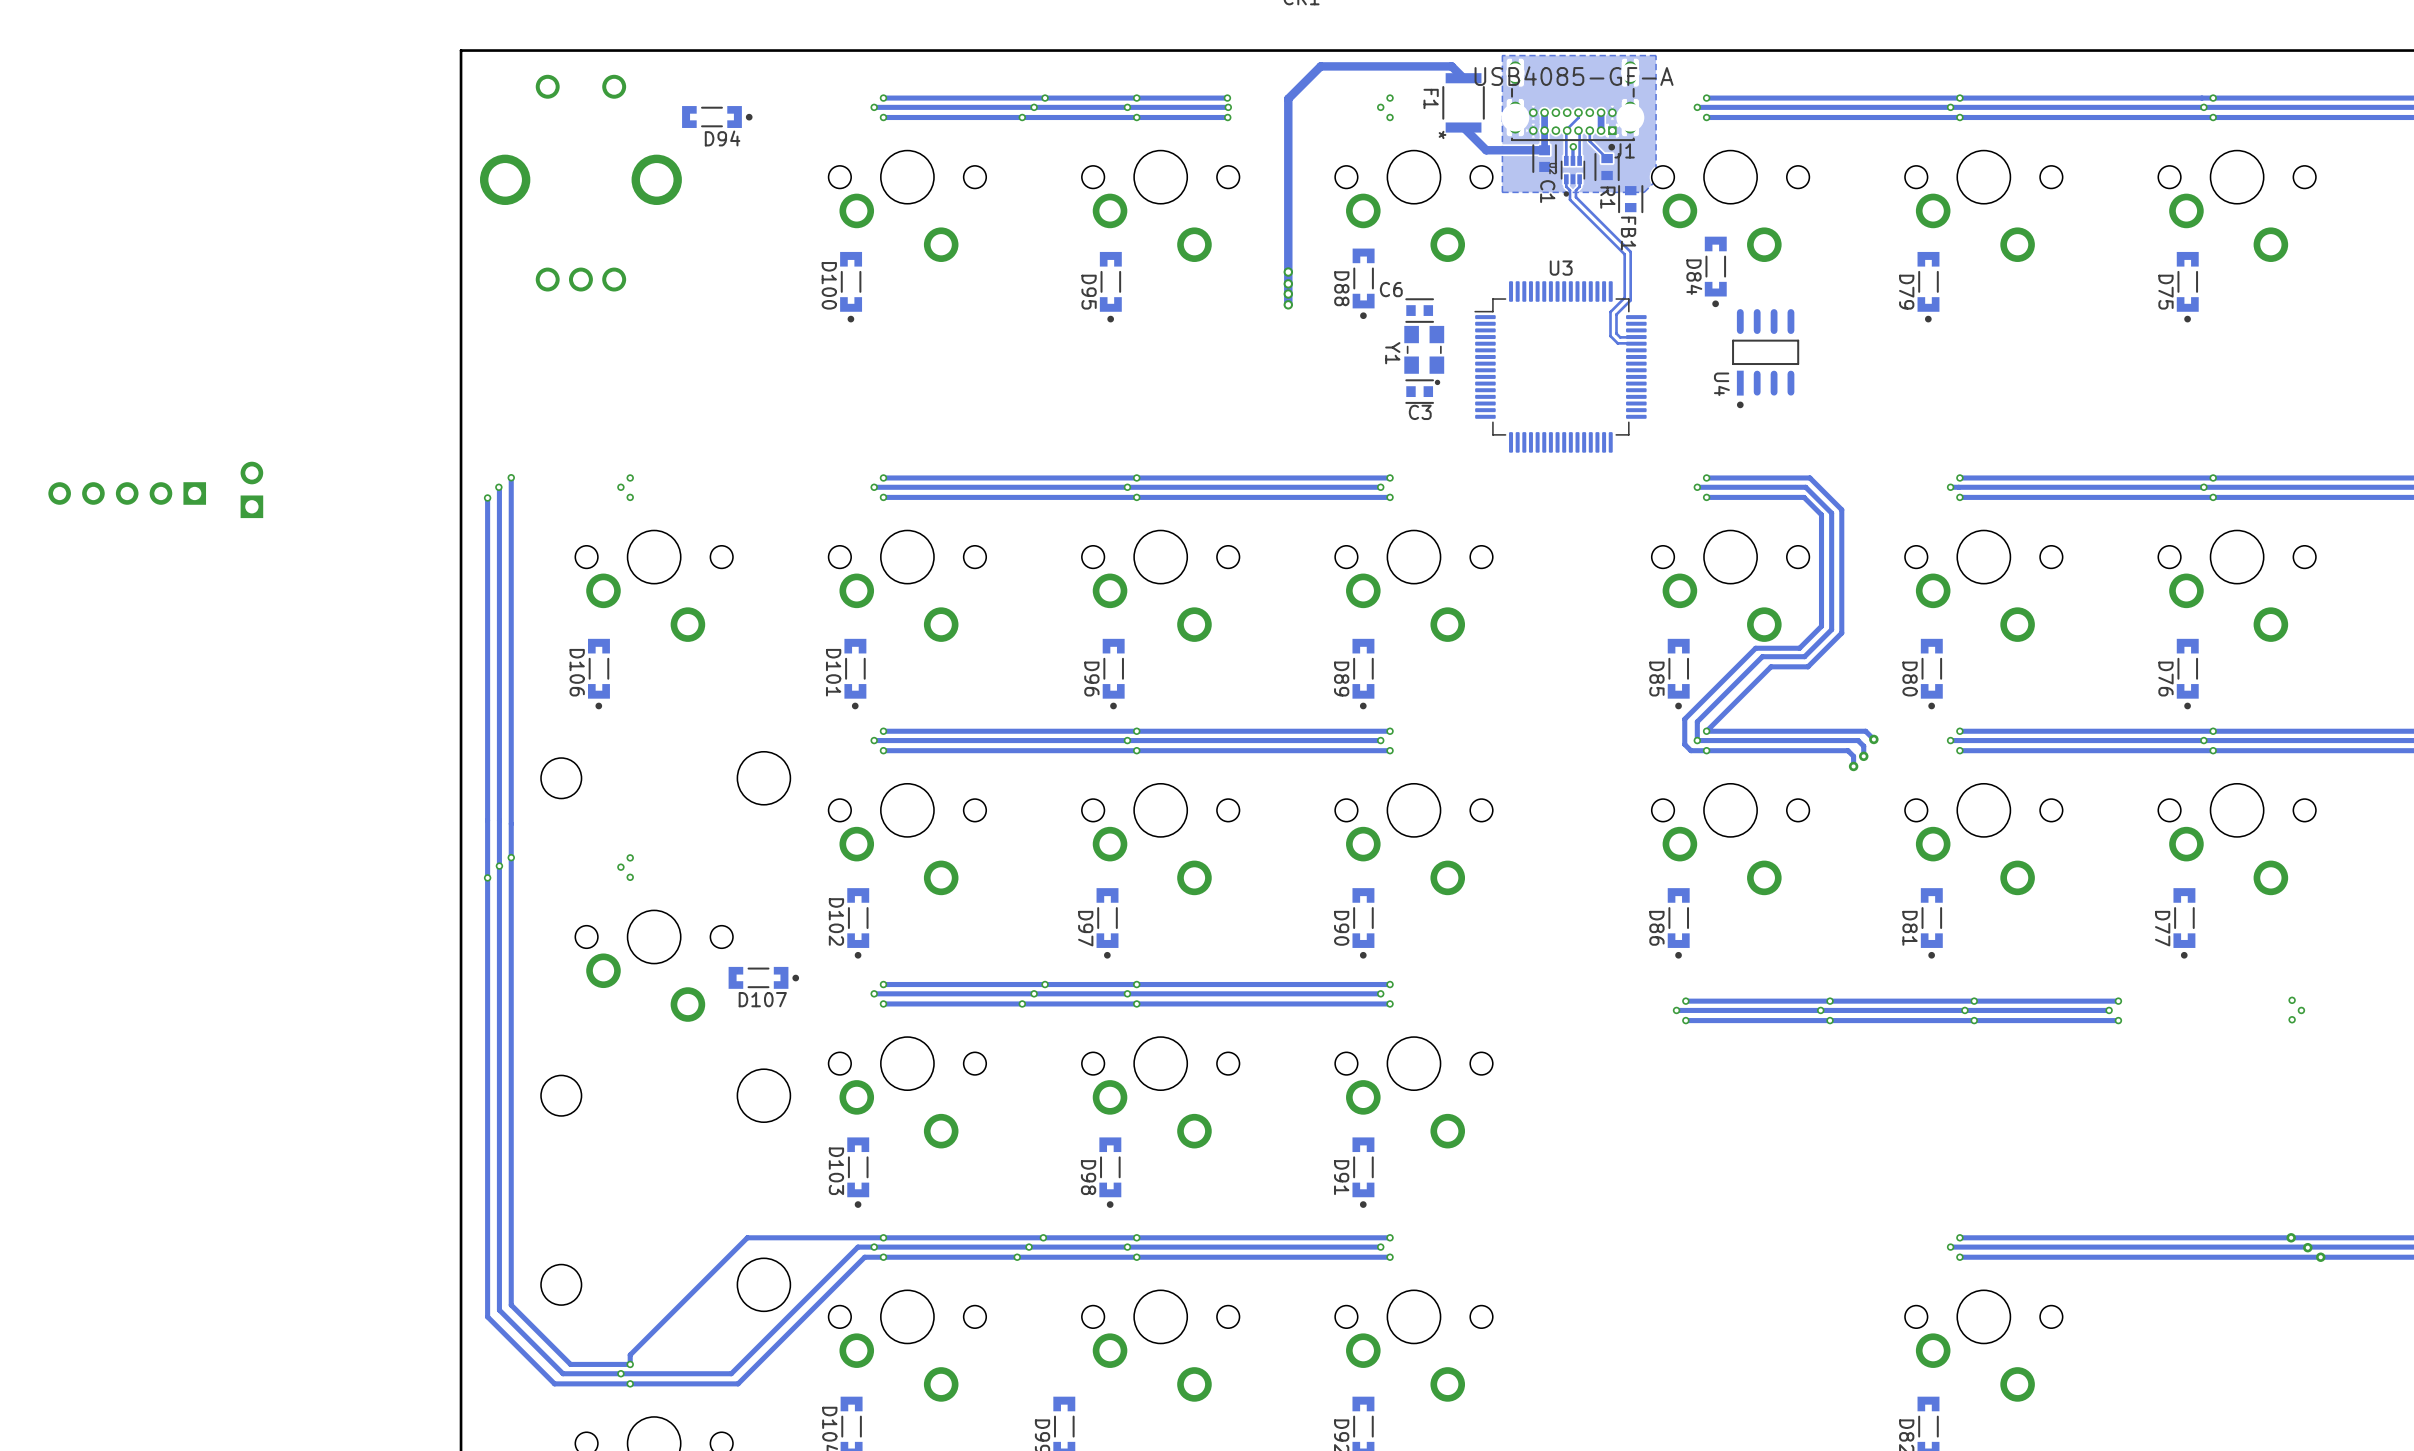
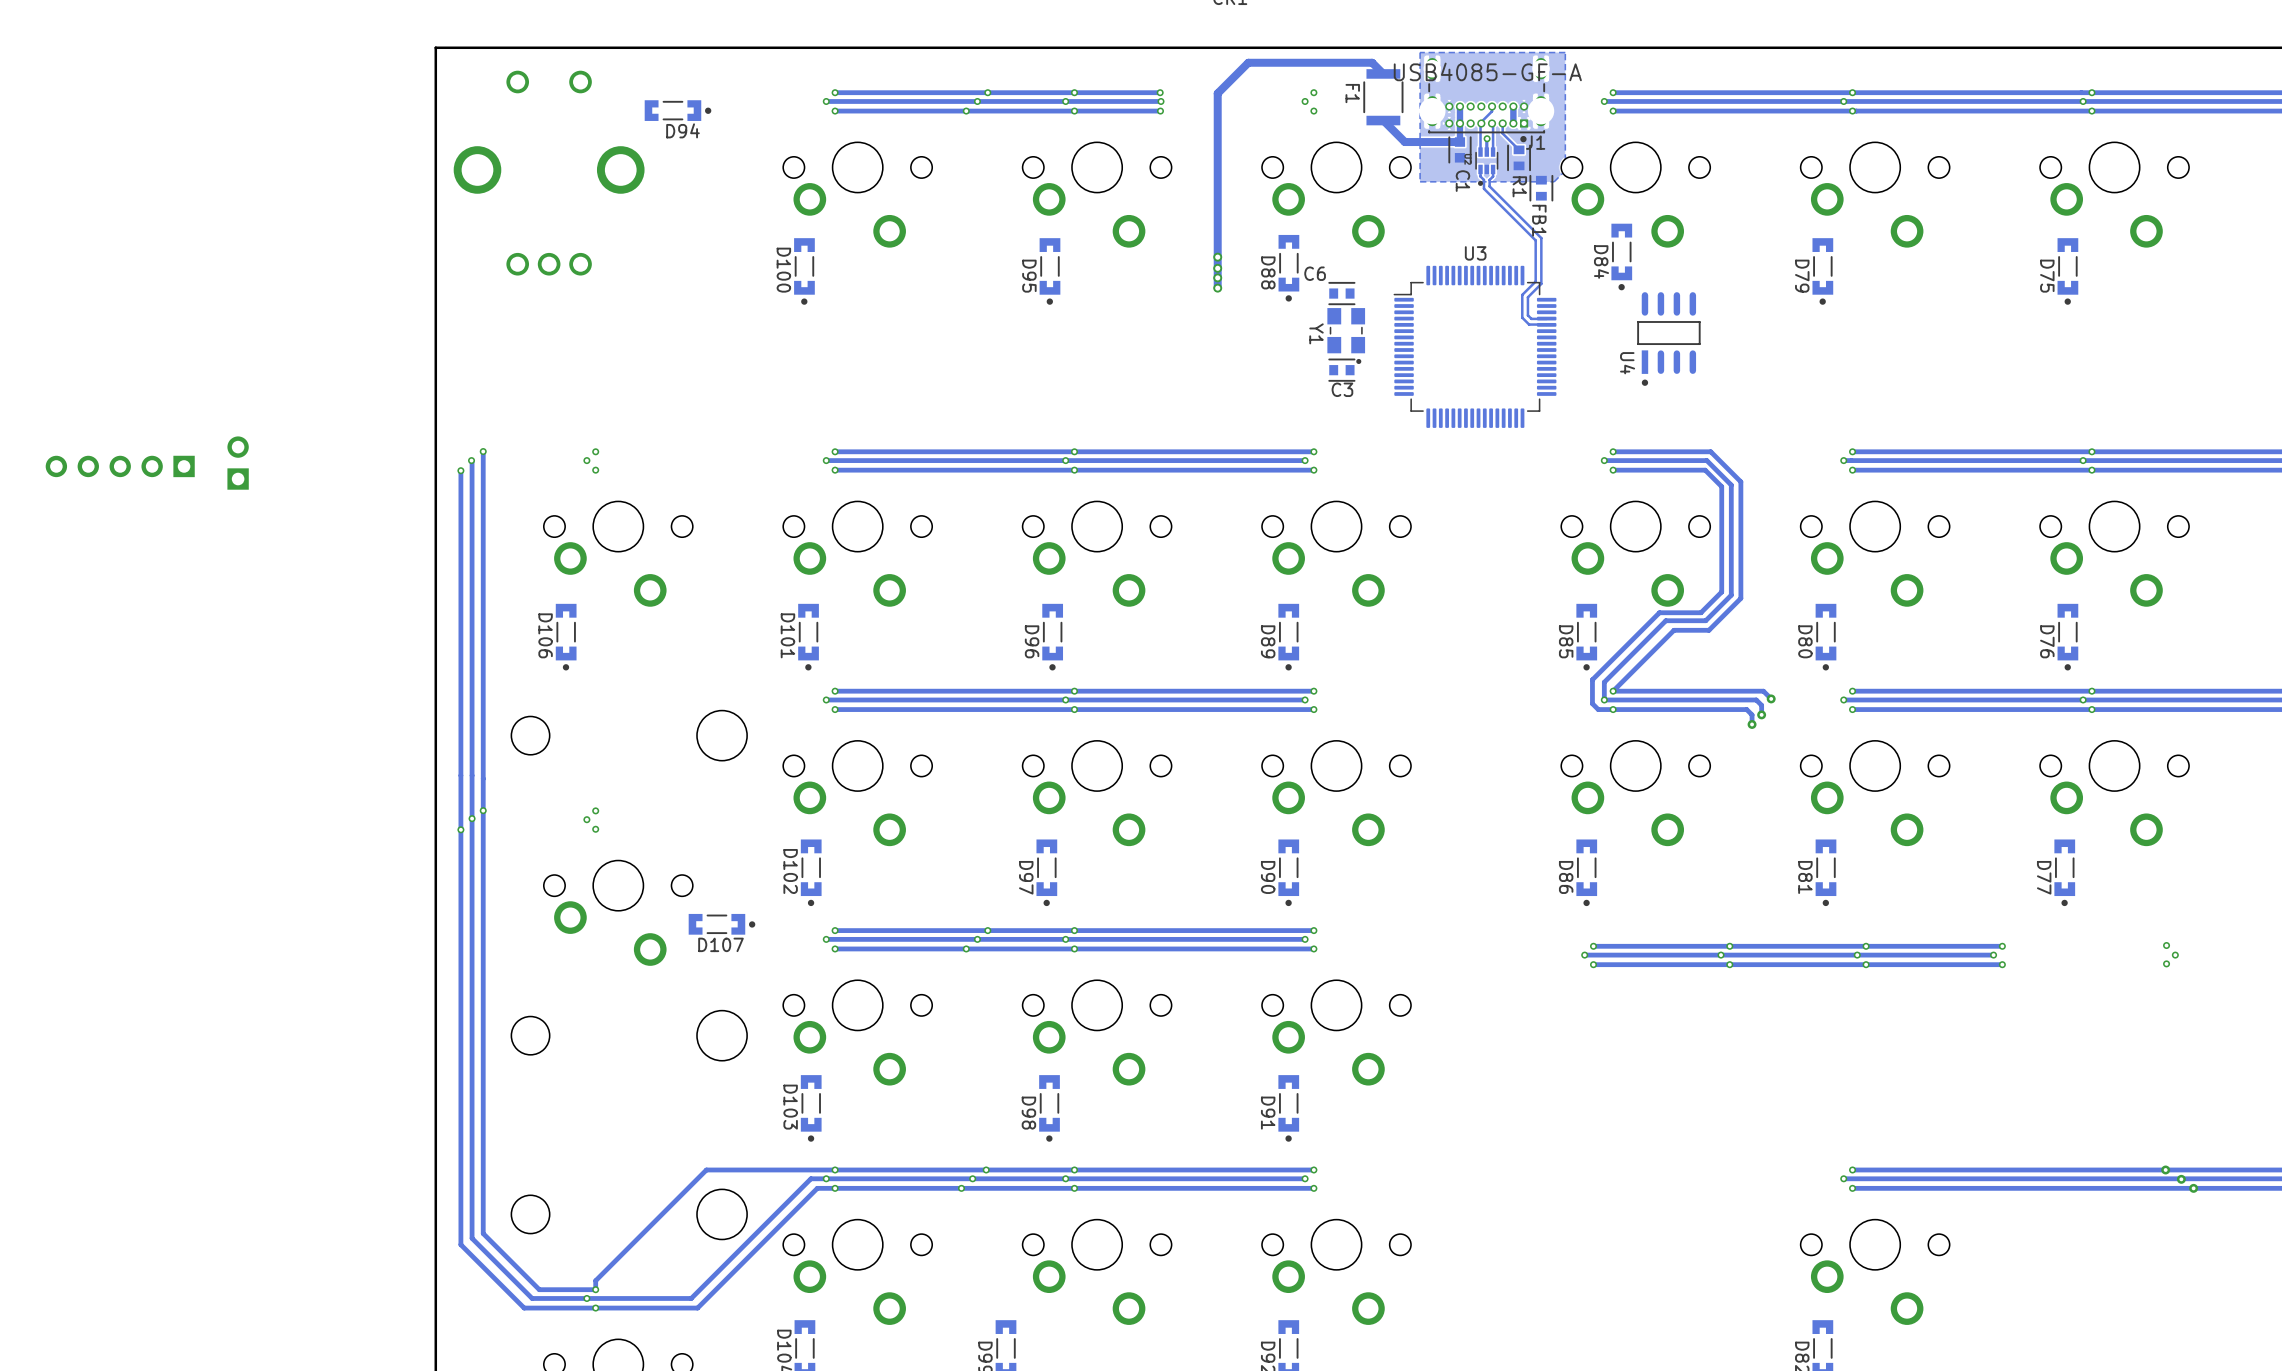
F1 text: * (1442, 134) -> none

